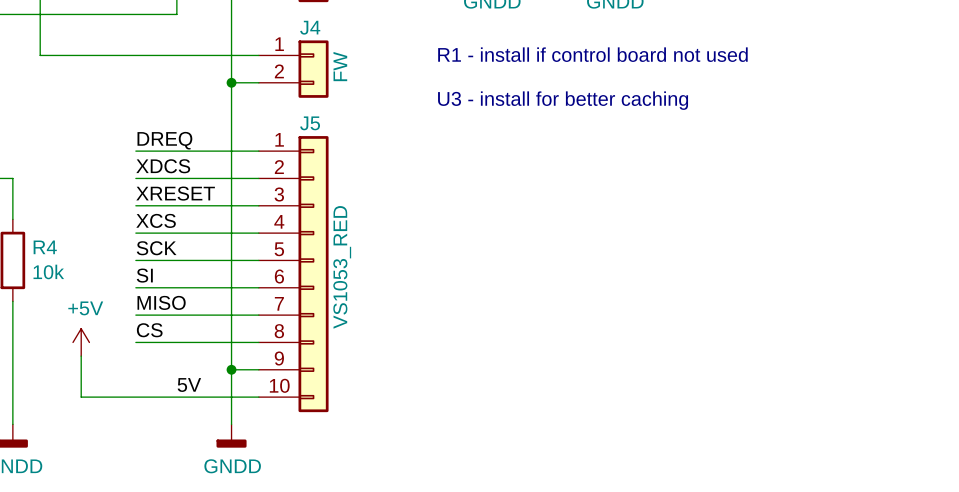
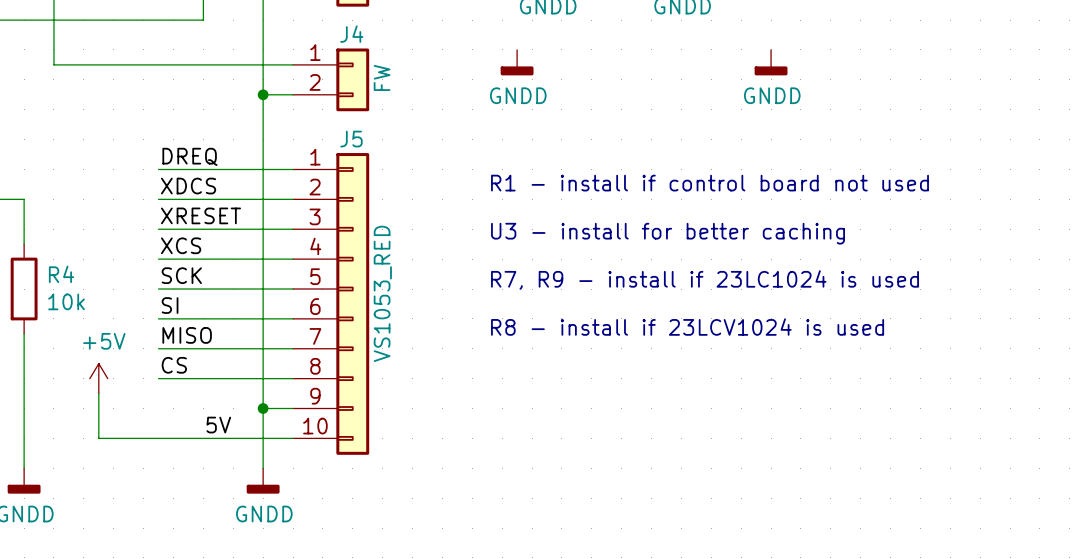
power symbol: none -> GNDD (517, 62)
power symbol: none -> GNDD (771, 62)
text position: R1 - install if control board not used (592, 54) -> R1 - install if control board not used (709, 183)
text position: U3 - install for better caching (563, 100) -> U3 - install for better caching (668, 233)
text: none -> R7, R9 - install if 23LC1024 is used (705, 280)
text: none -> R8 - install if 23LCV1024 is used (687, 327)

